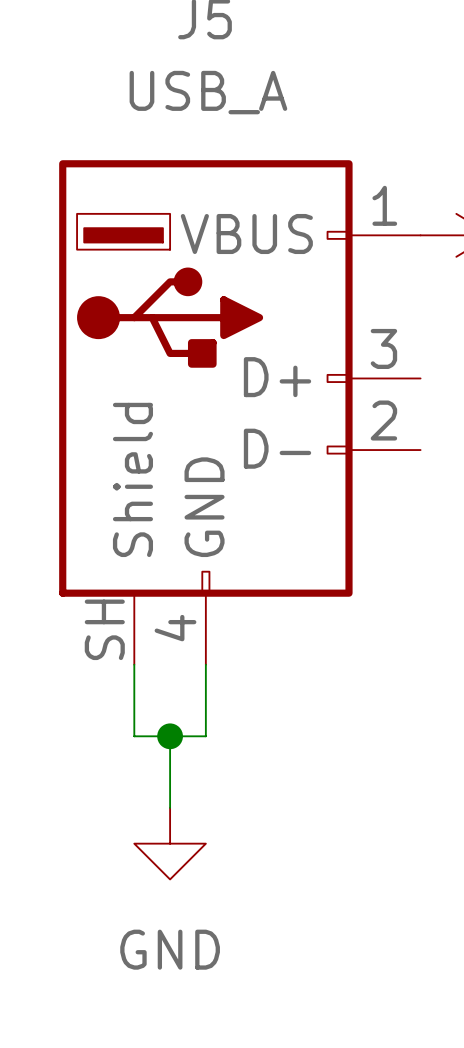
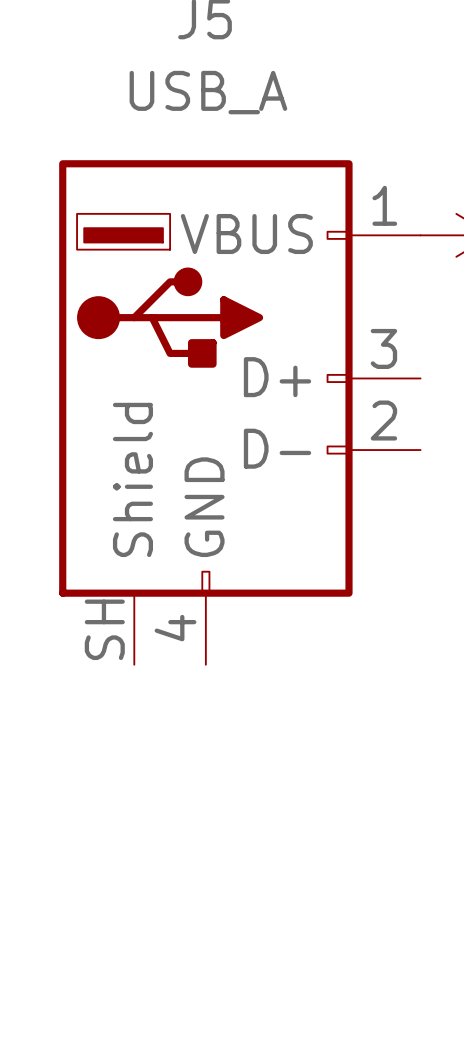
wire: (134, 664) (134, 736) (205, 736) (205, 664) -> none
wire: (170, 736) (170, 807) -> none
junction: (170, 736) -> none
power symbol: GND (170, 843) -> none

